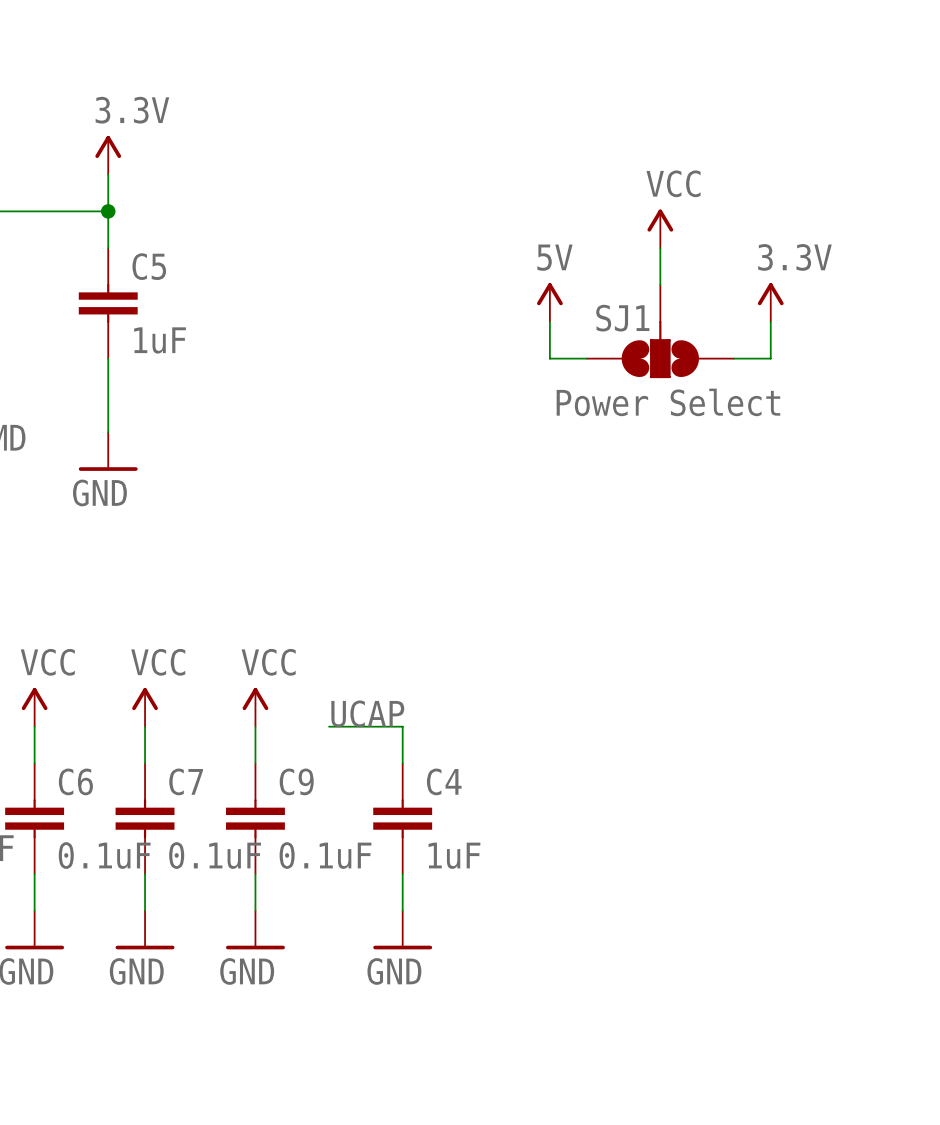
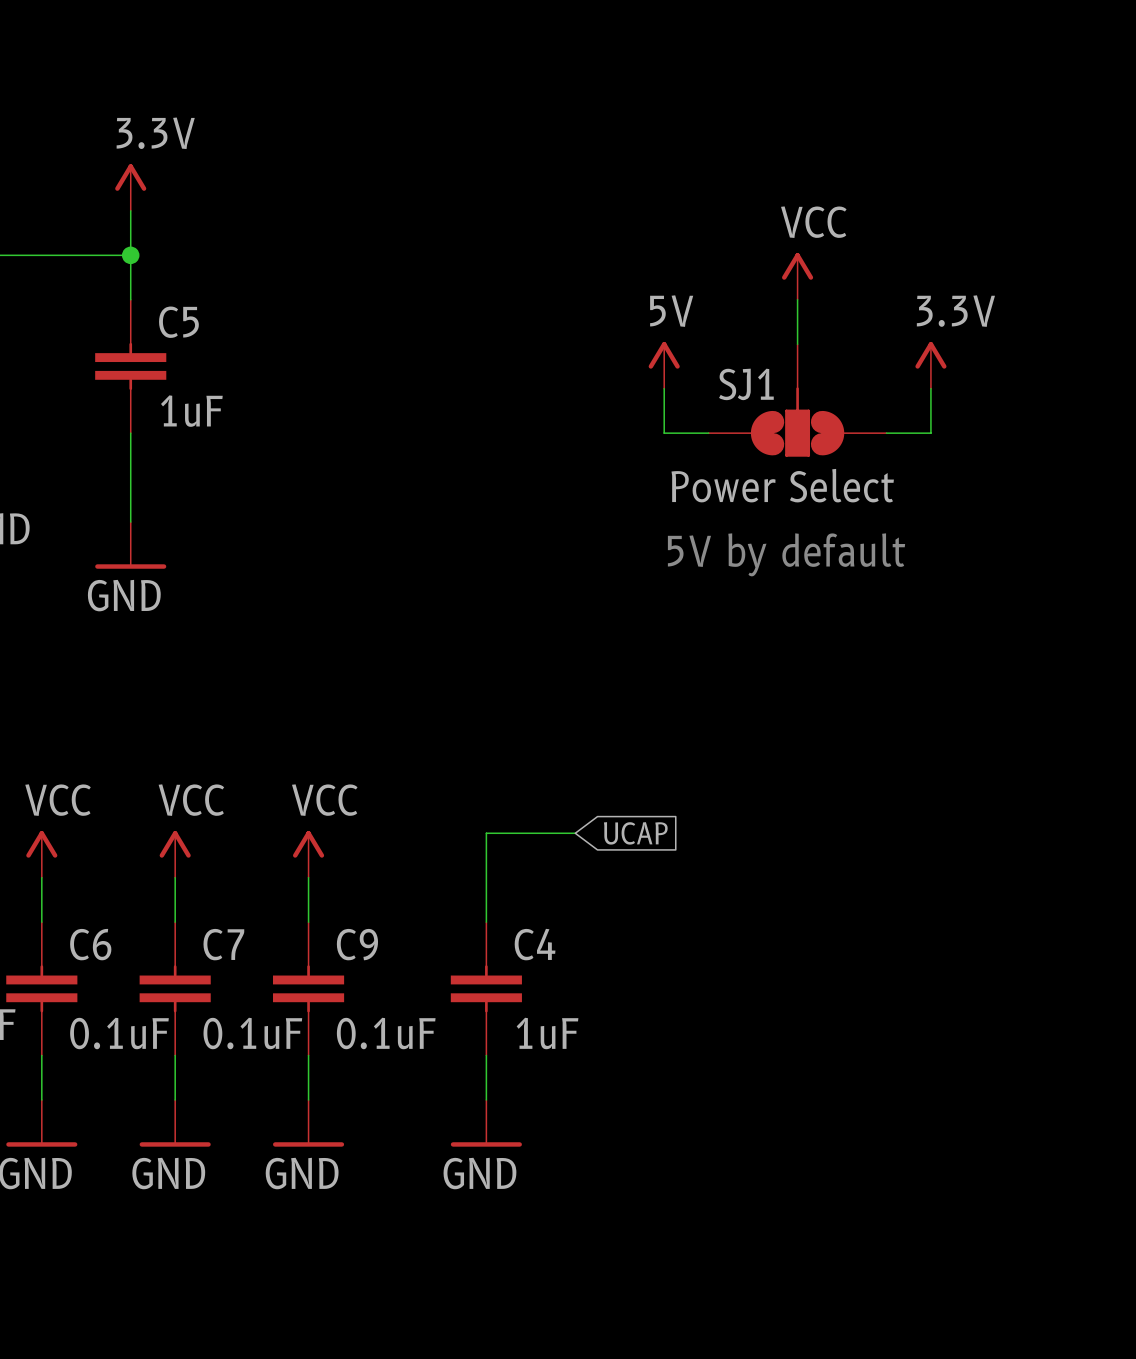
text: none -> 5V by default (786, 554)
global label: none -> UCAP (635, 833)
label: UCAP (367, 713) -> none
wire: (329, 726) (402, 726) -> (575, 833) (486, 833) (486, 877)

